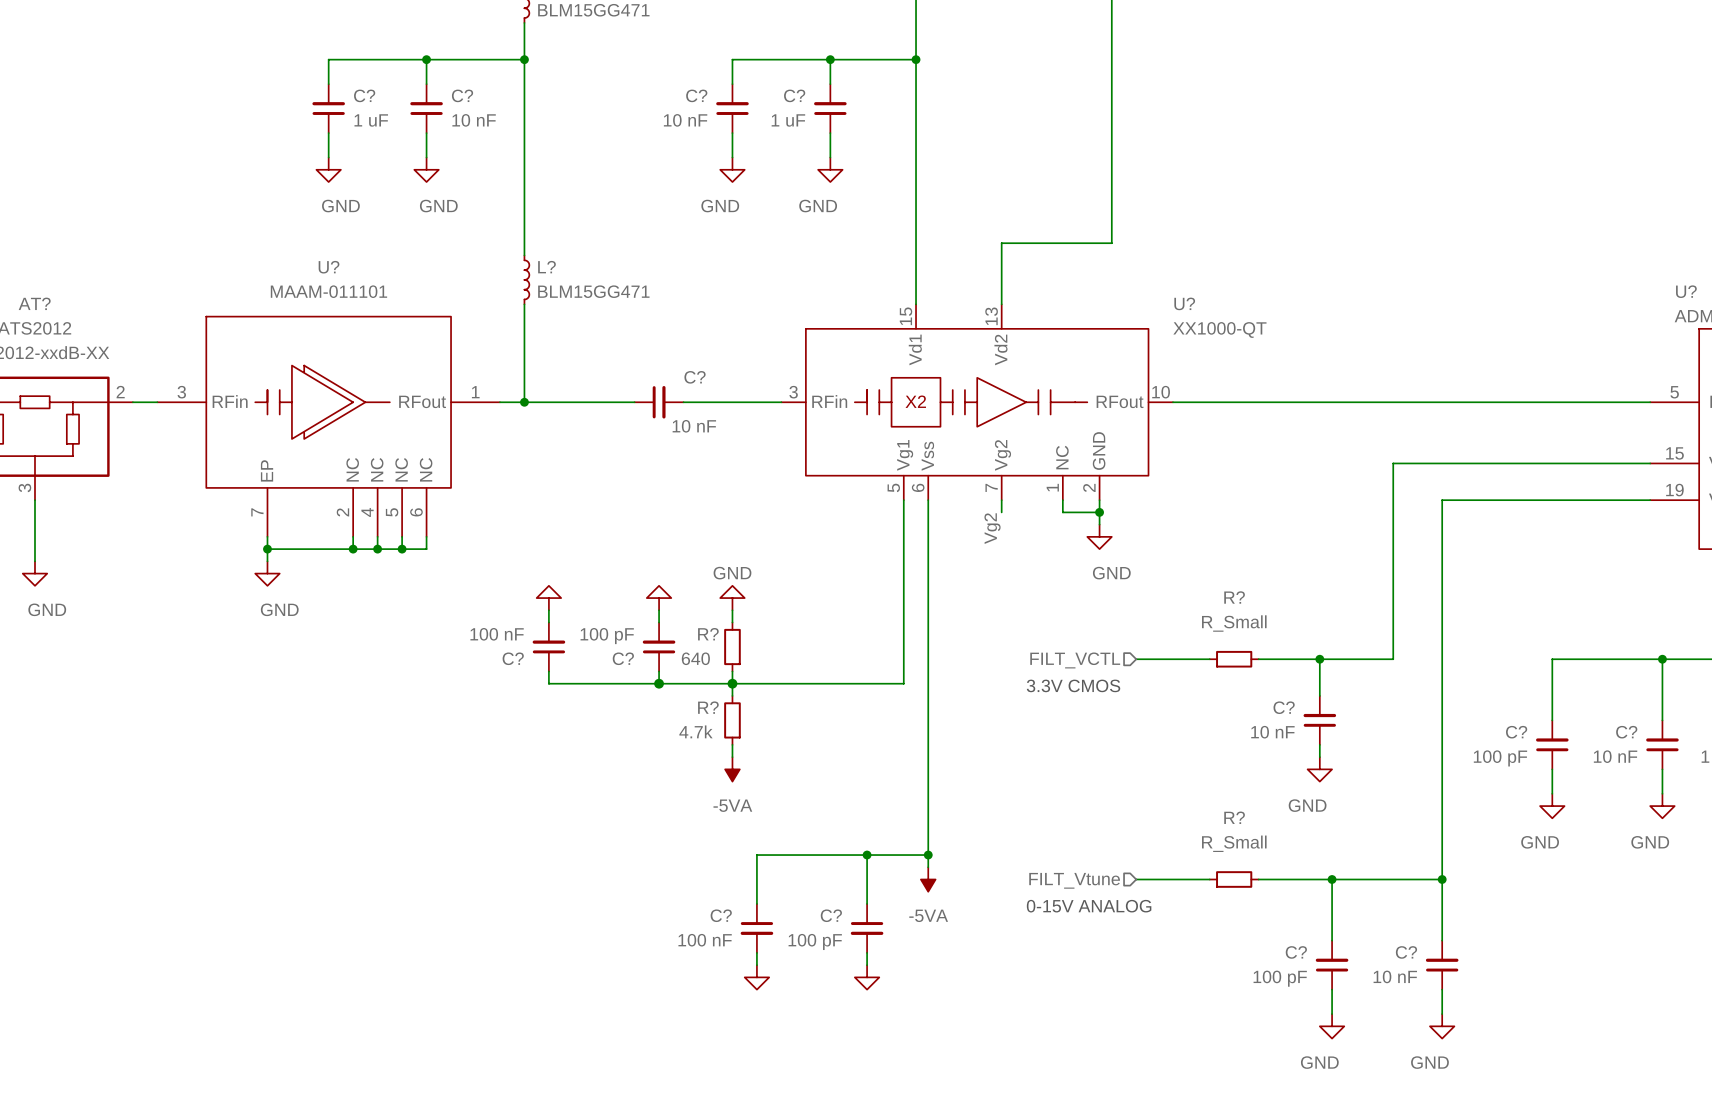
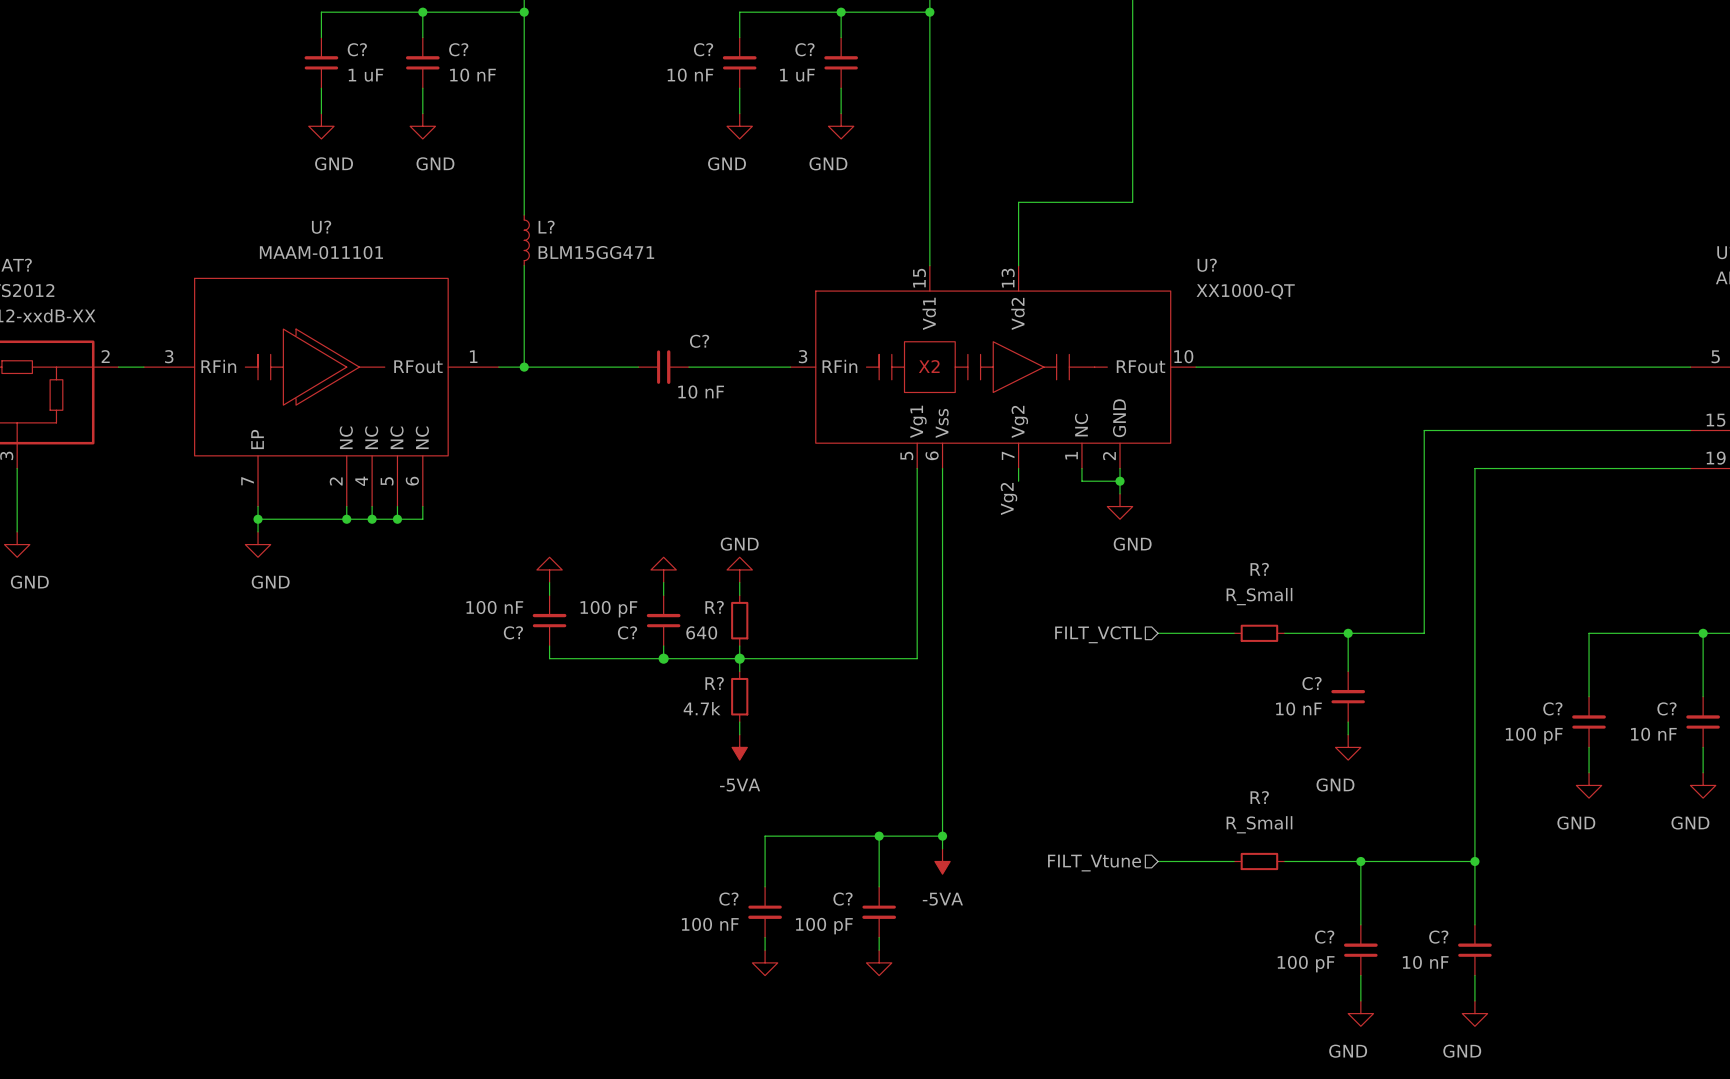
text: 3.3V CMOS (1073, 685) -> none
text: 0-15V ANALOG (1089, 906) -> none

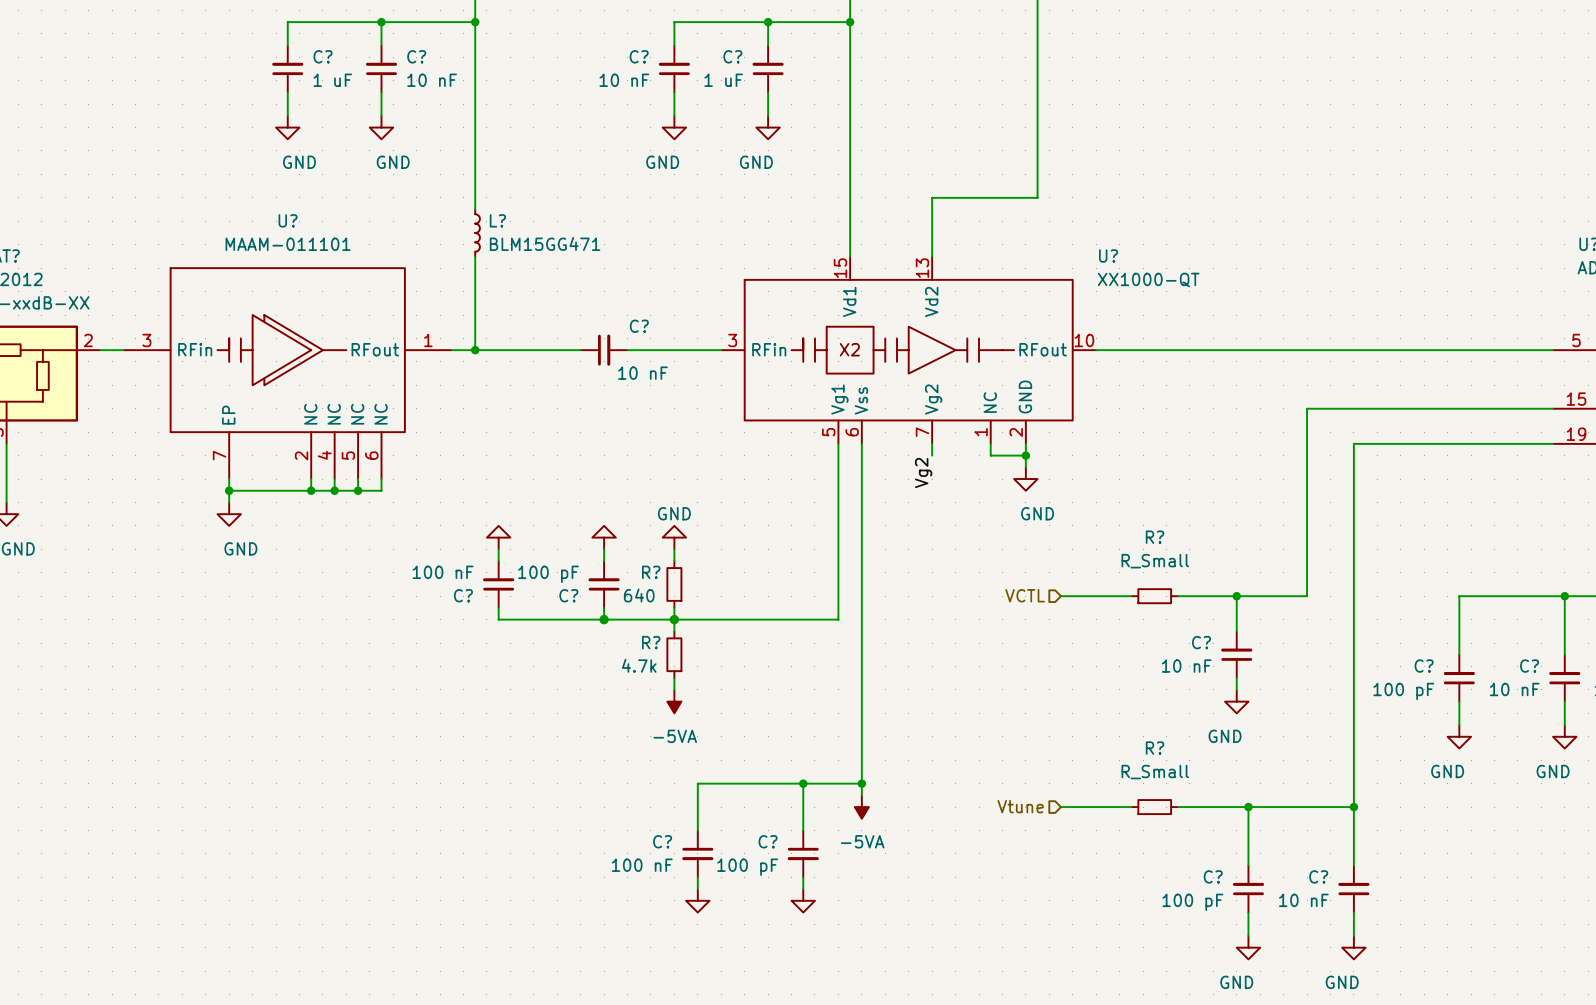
hierarchical label: FILT_VCTL (1098, 634) -> VCTL (1025, 595)
hierarchical label: FILT_Vtune (1094, 863) -> Vtune (1020, 806)

